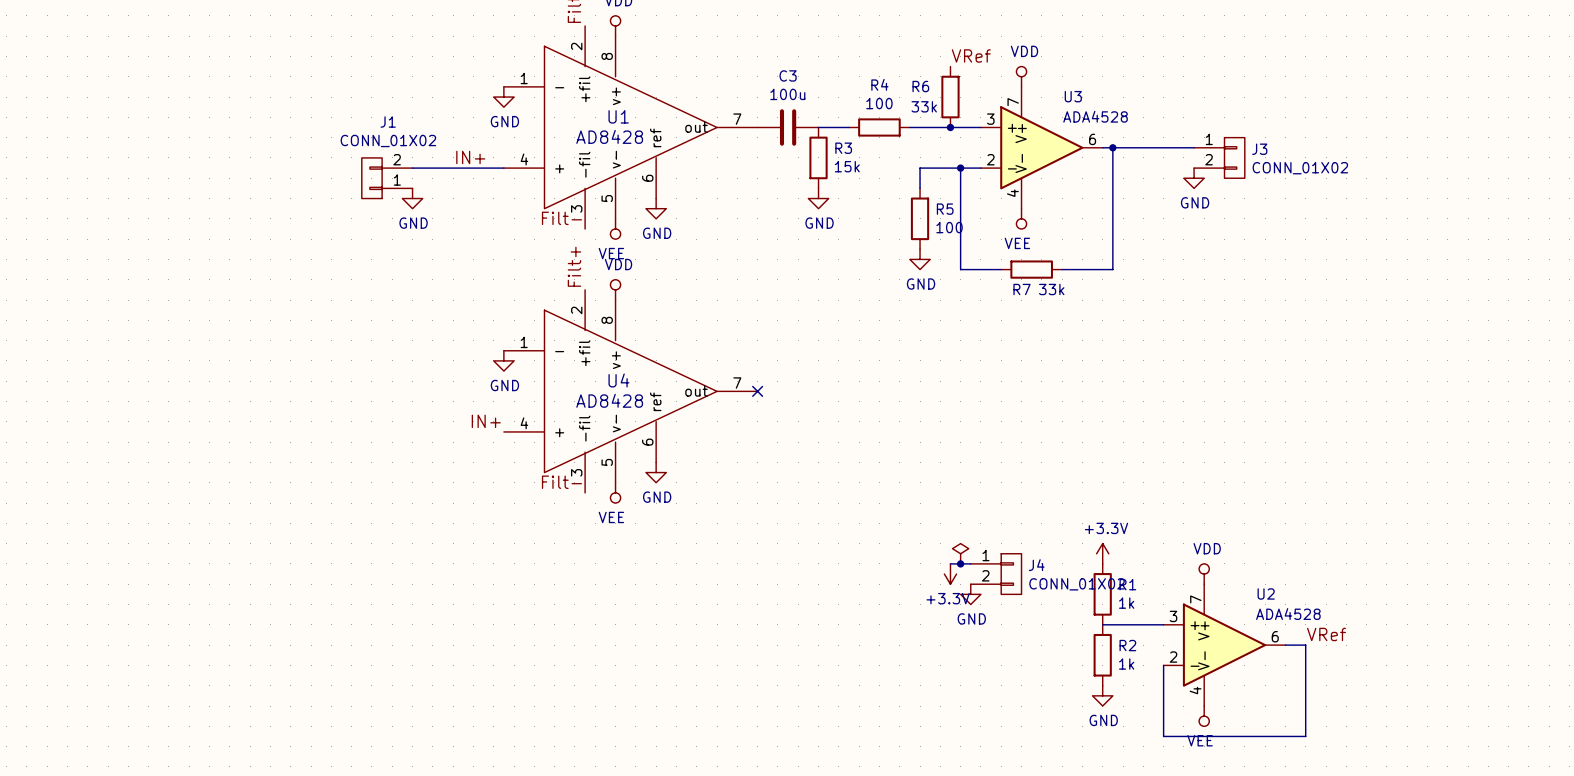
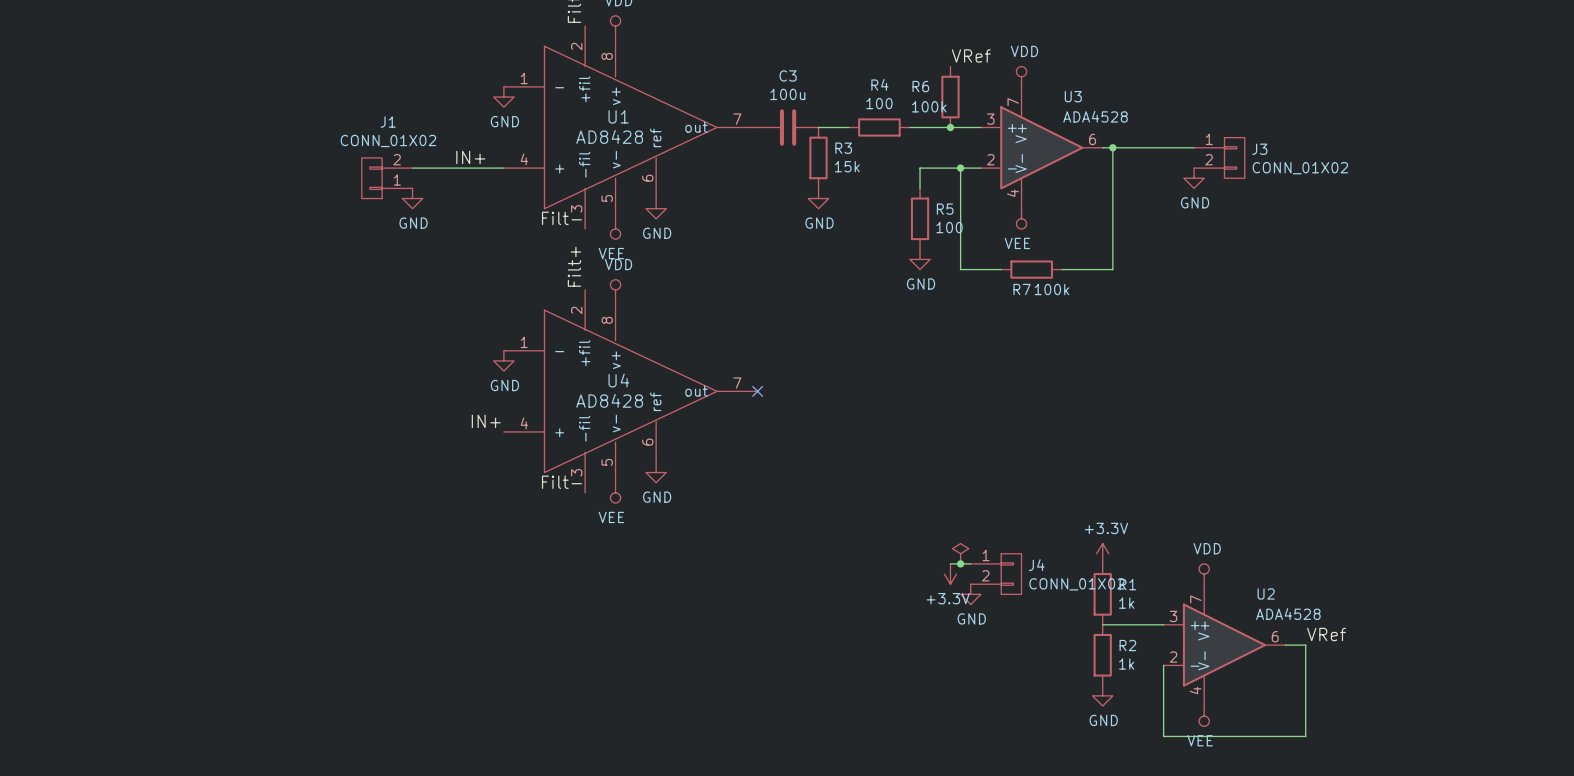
R6 value: 33k (924, 106) -> 100k (929, 106)
R7 value: 33k (1051, 289) -> 100k (1051, 289)

